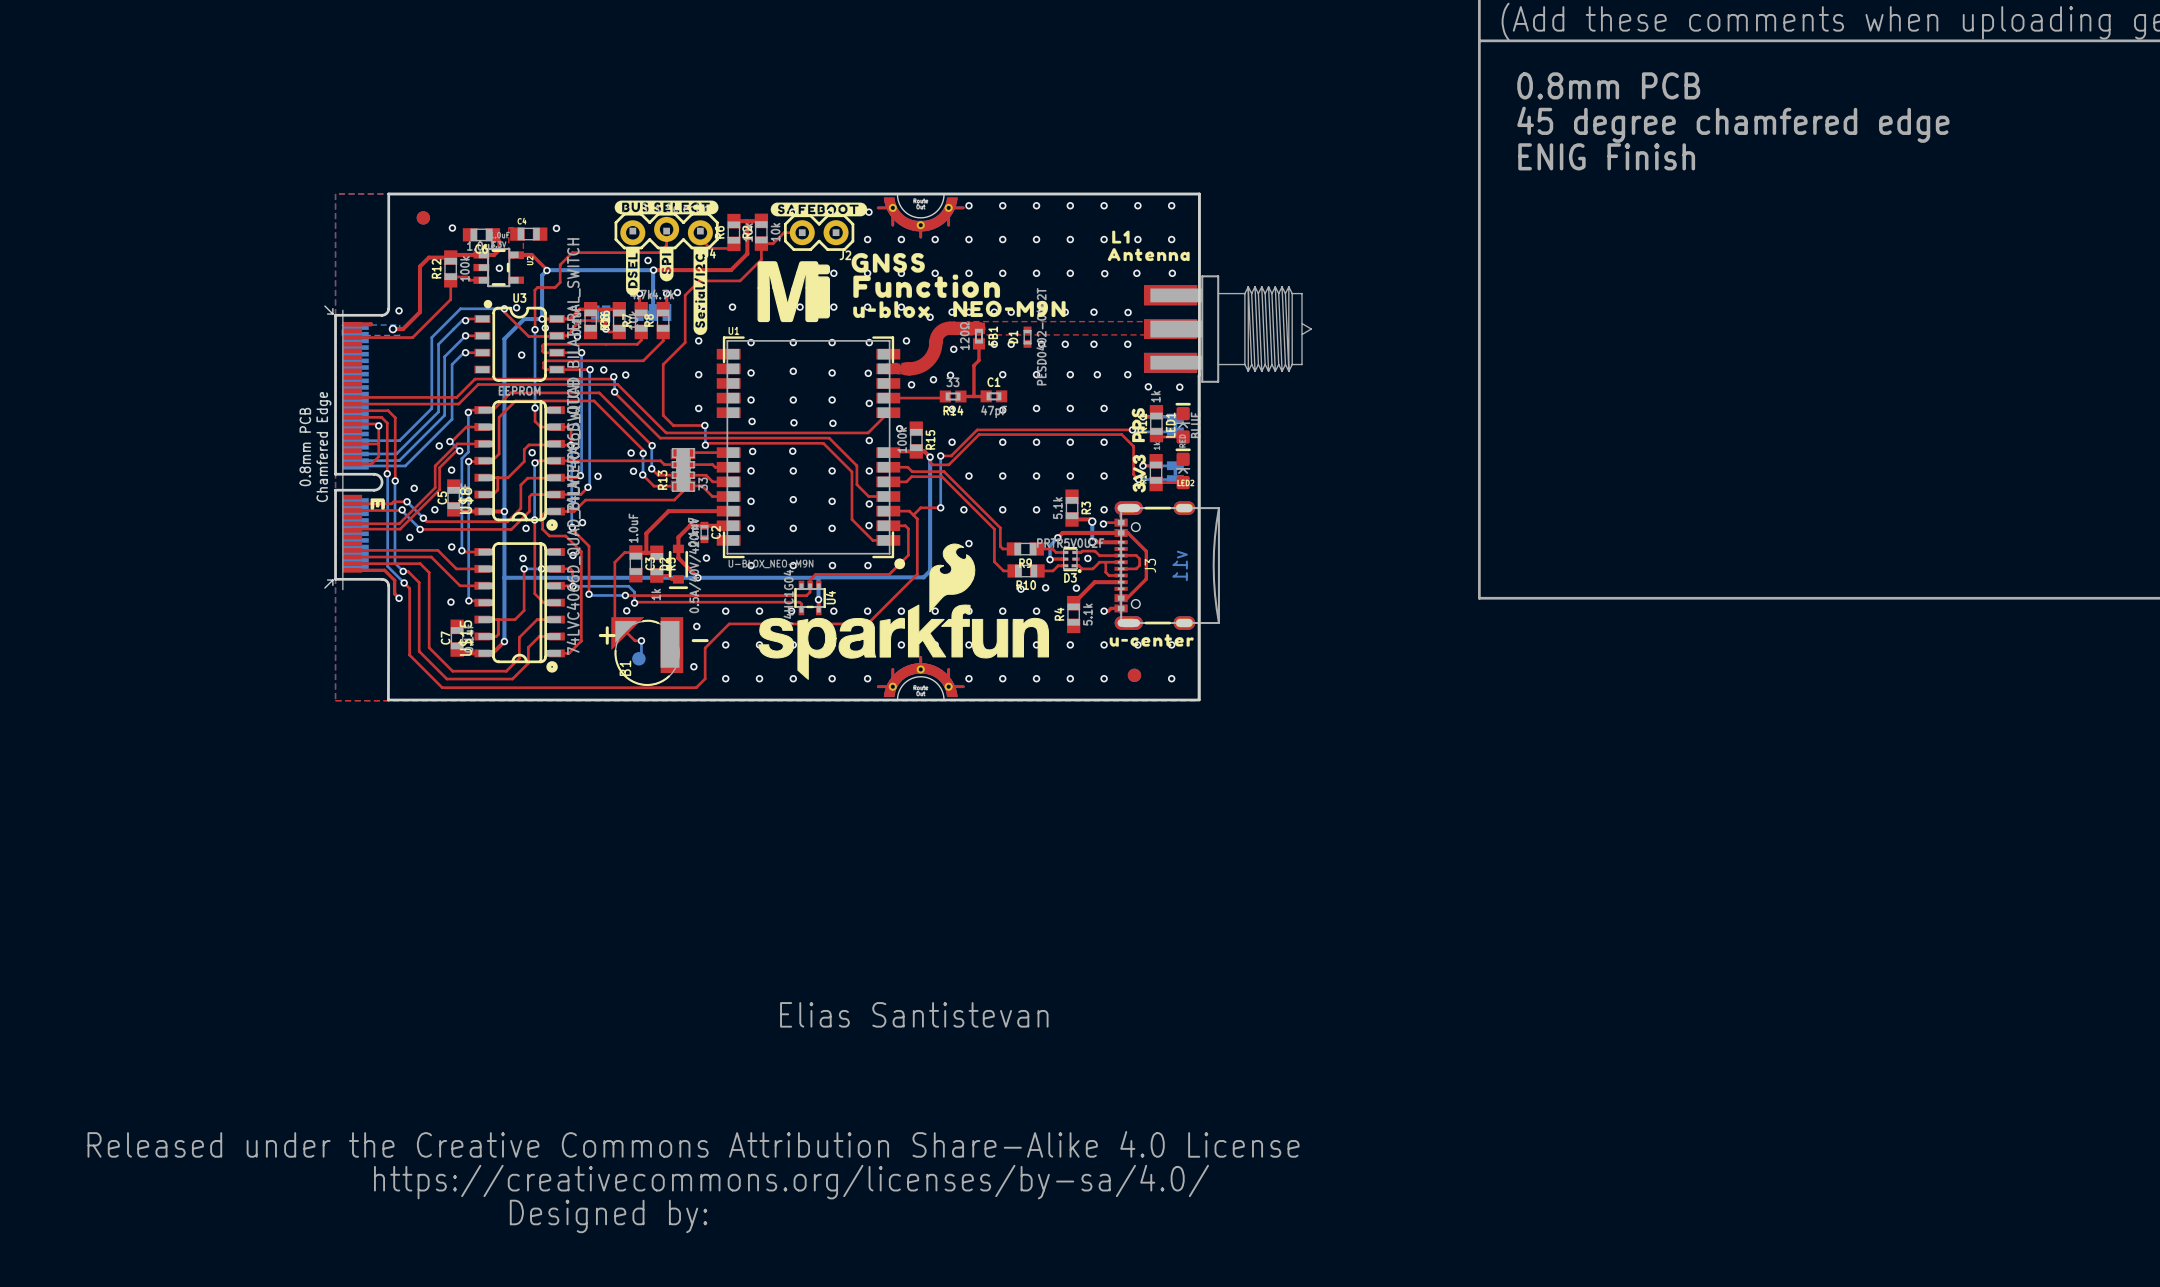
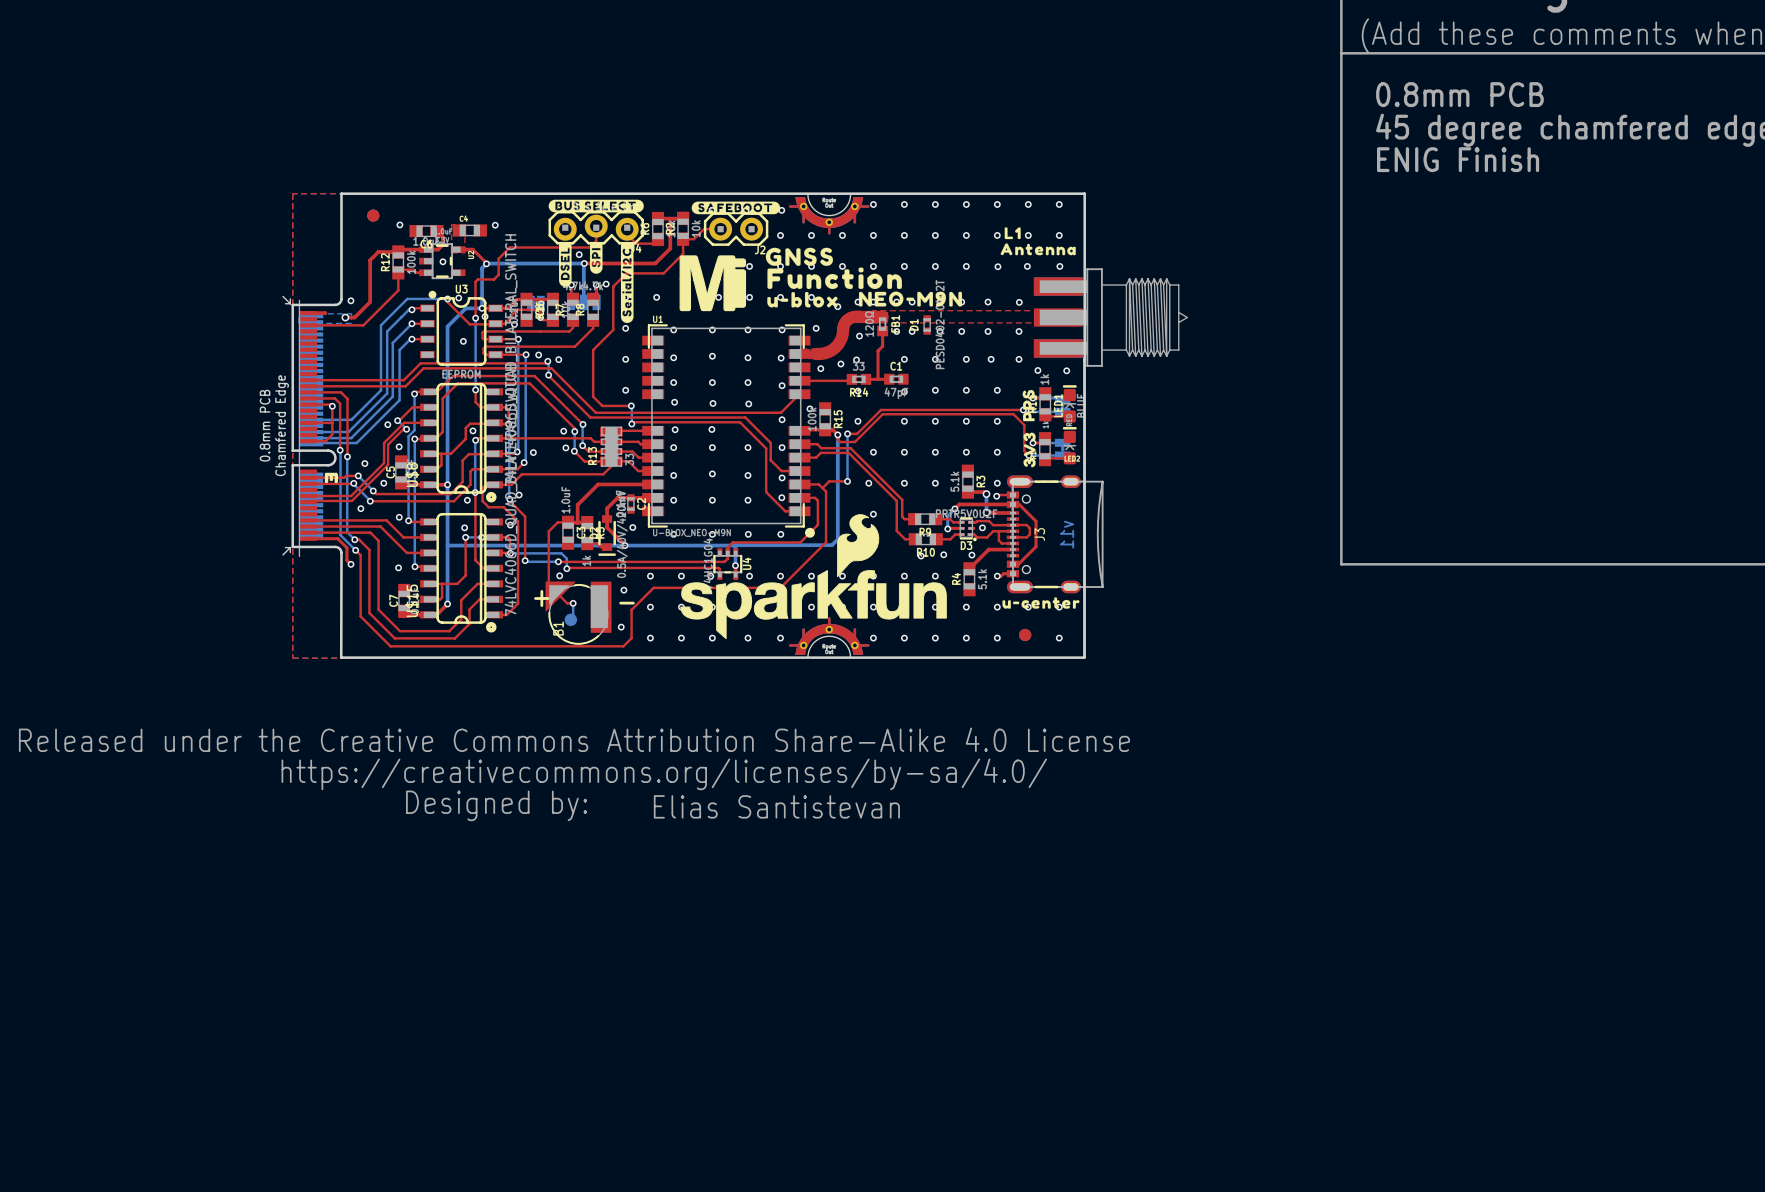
drawing: none -> [18, 727, 1131, 822]
text position: Elias Santistevan (914, 1014) -> Elias Santistevan (776, 806)
drawing: [87, 1131, 1300, 1234] -> none

